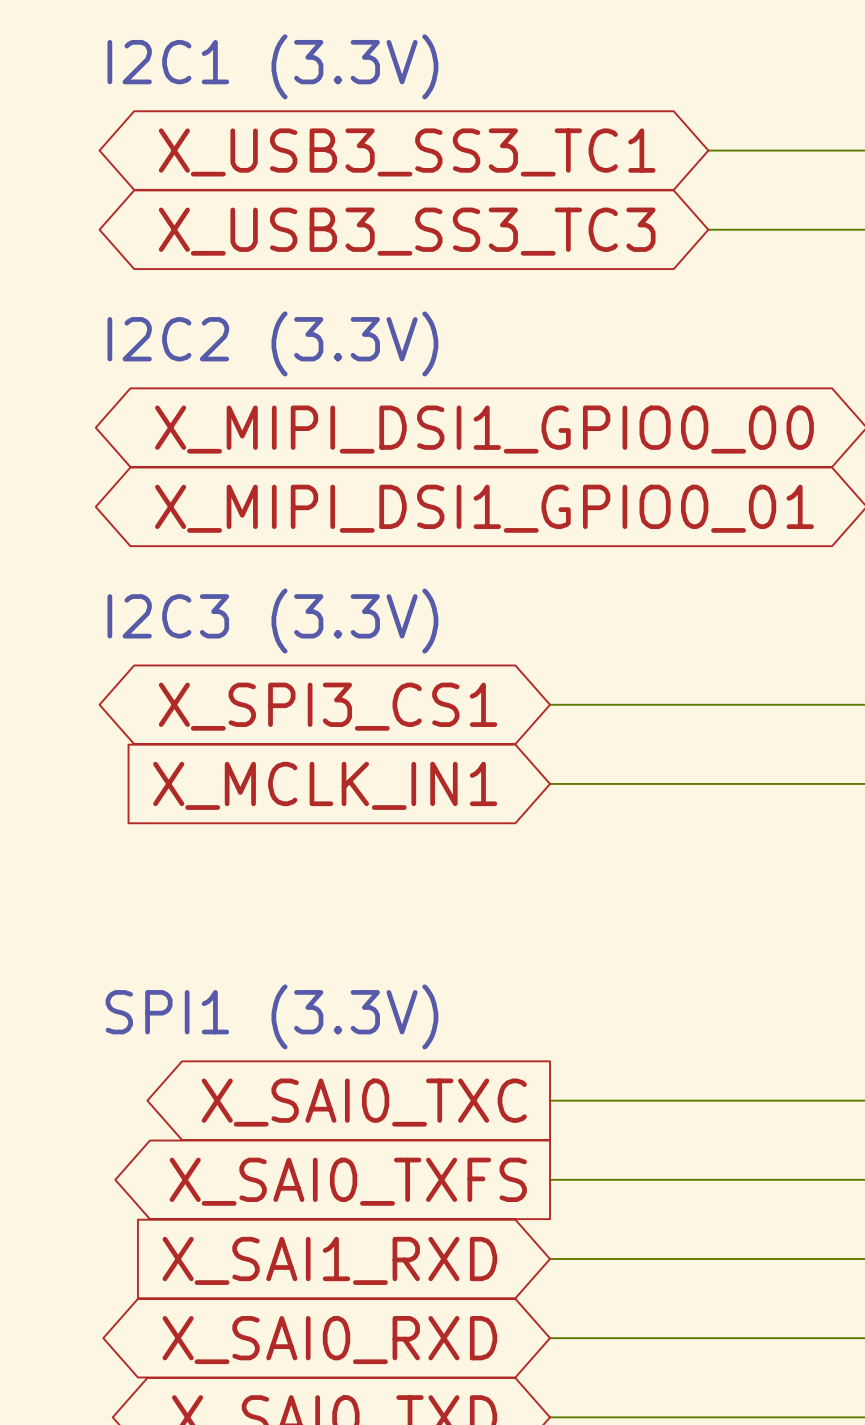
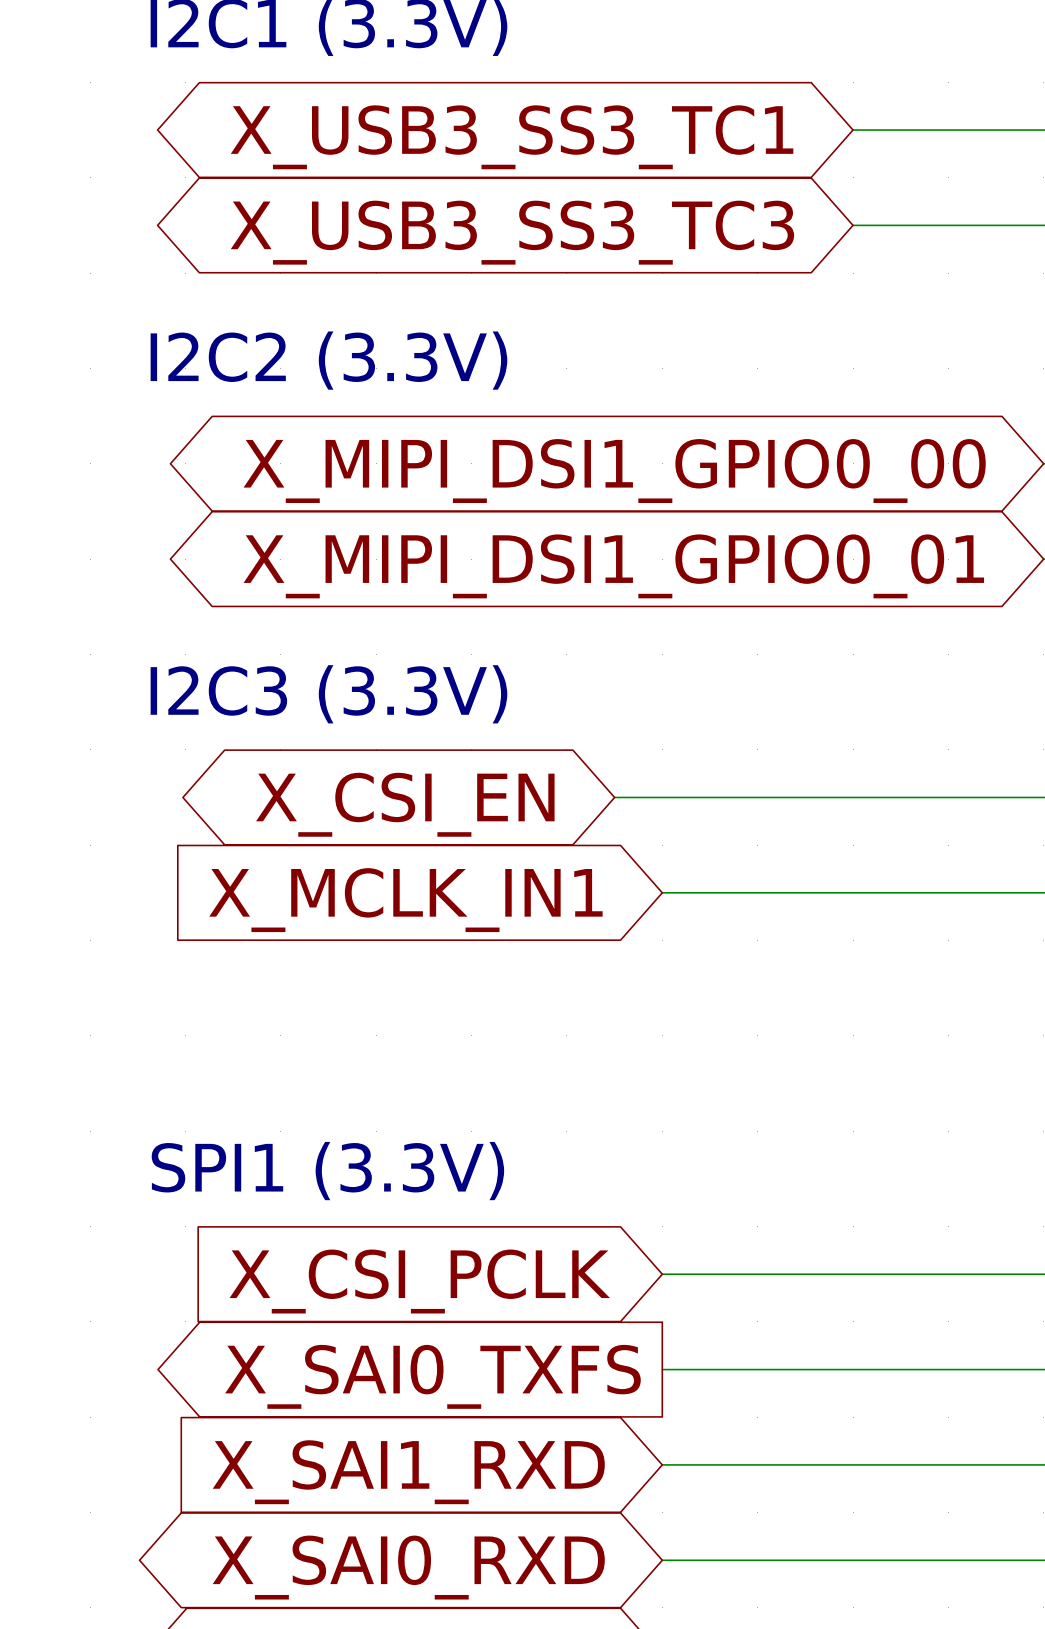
wire: none -> (614, 797) (662, 797)
global label: none -> X_CSI_EN (405, 804)
global label: X_SPI3_CS1 (328, 706) -> none
global label shape: output (364, 1102) -> input (419, 1281)
global label: X_SAI0_TXC (364, 1102) -> X_CSI_PCLK (419, 1281)

